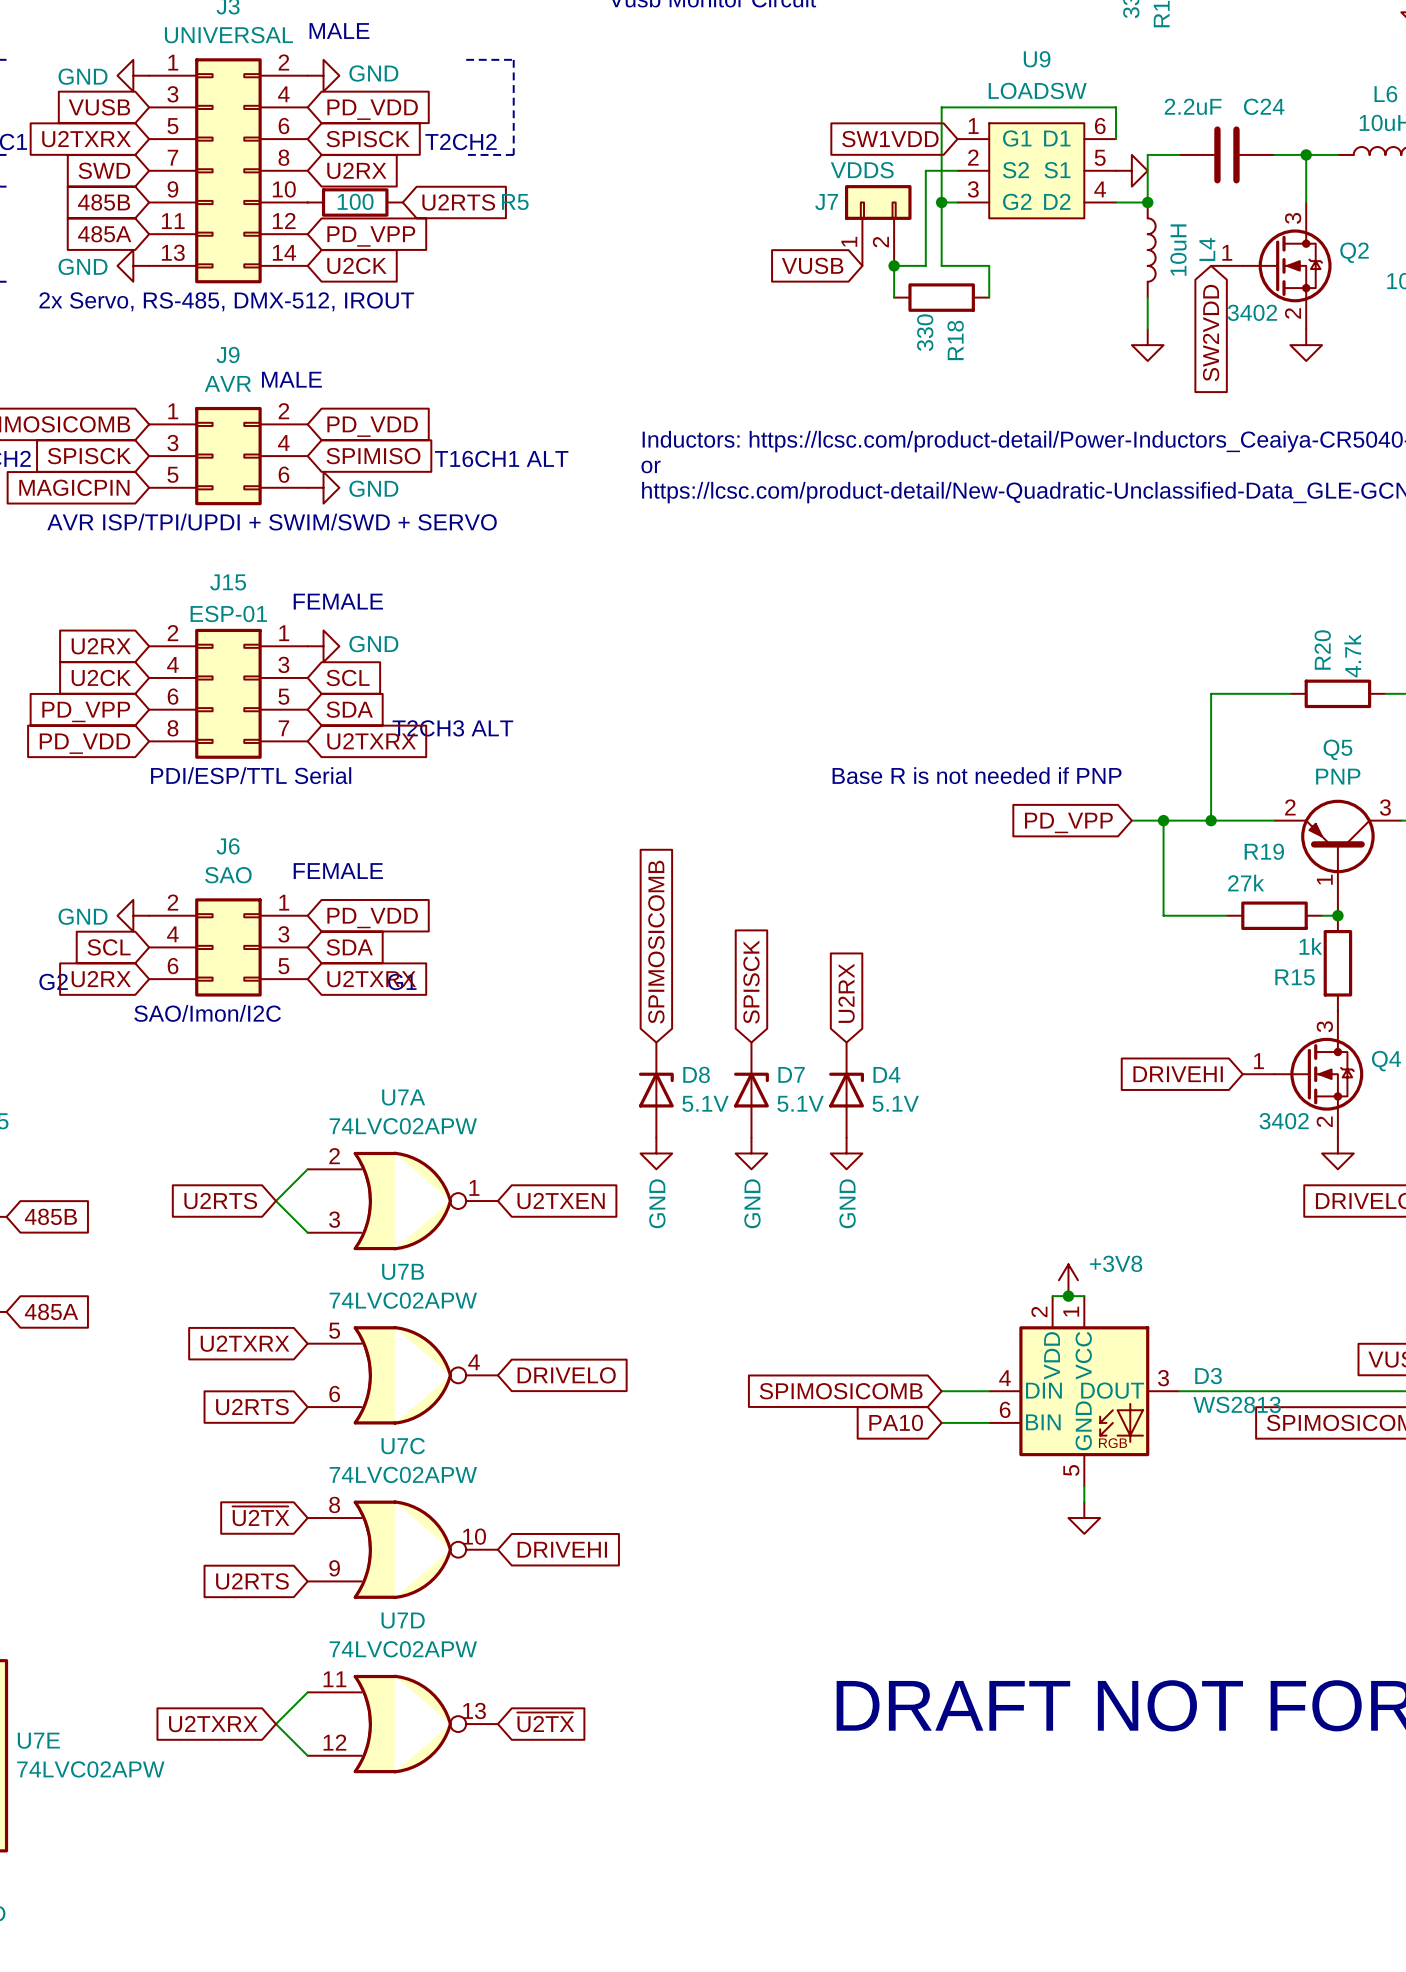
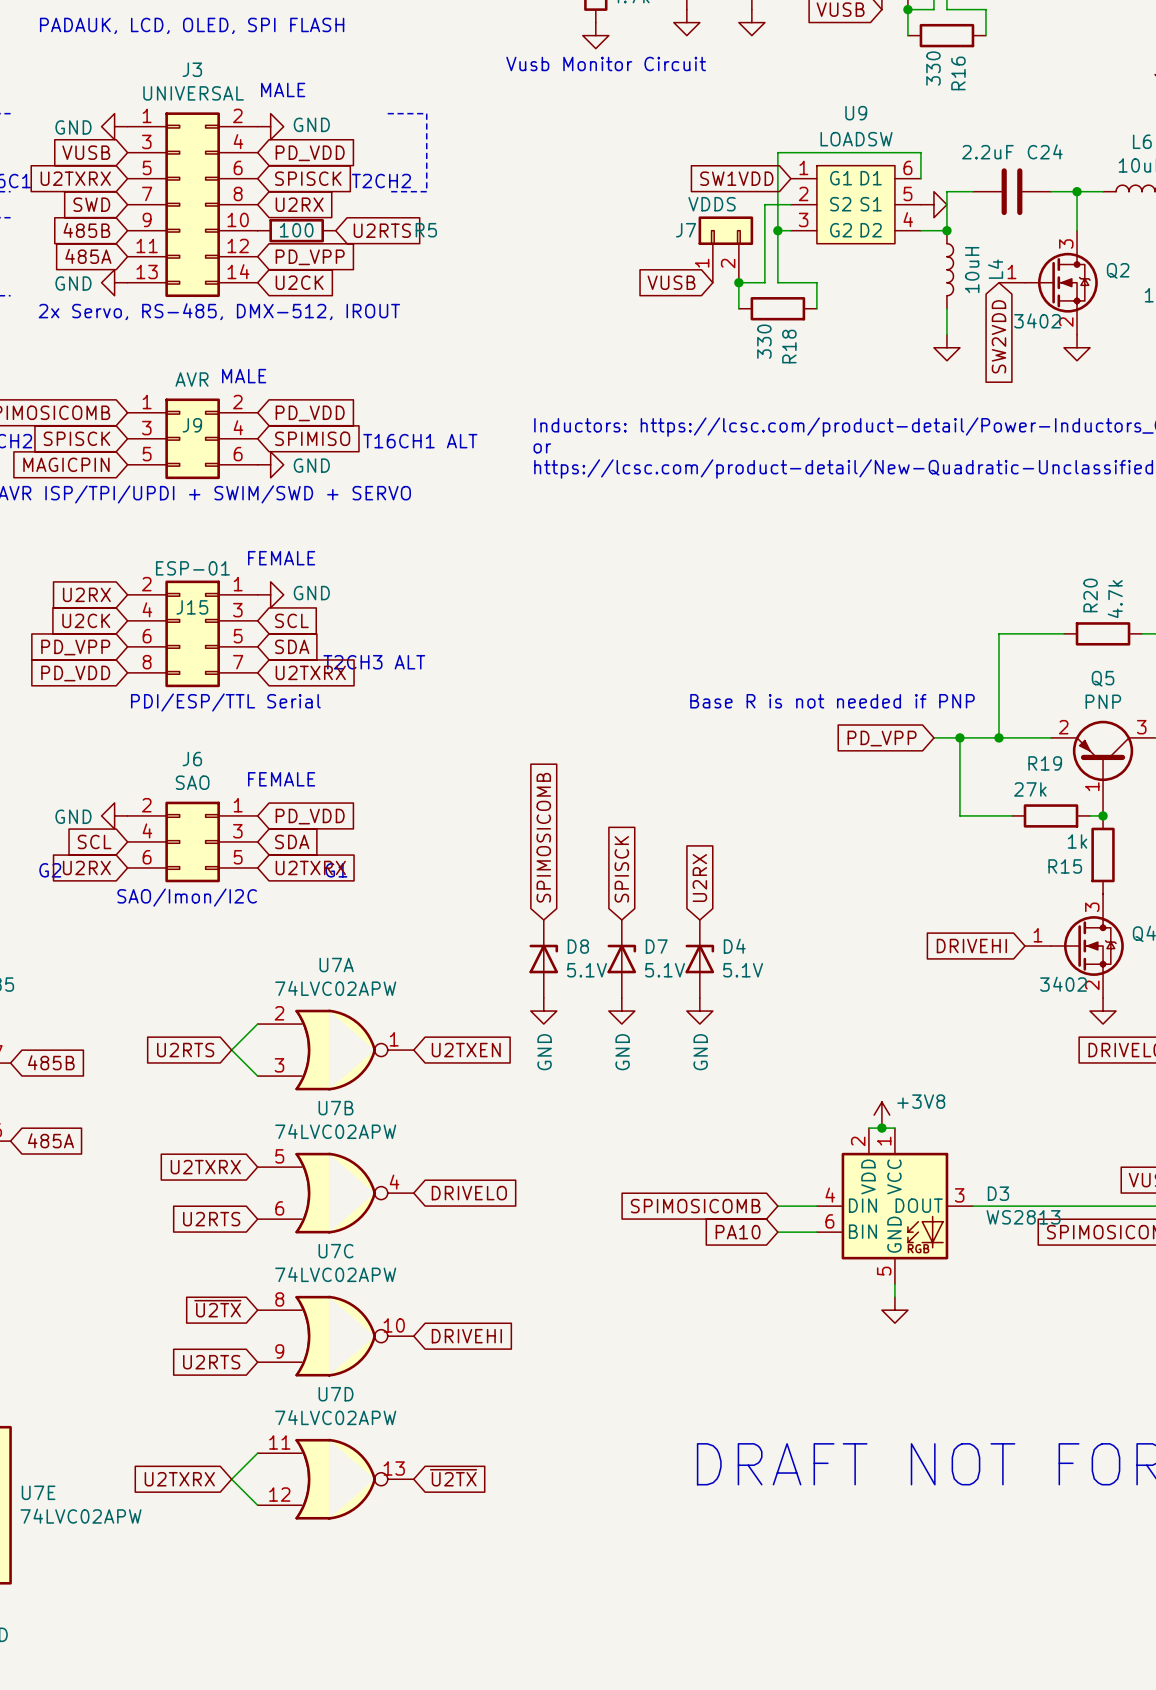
J9 name position: J9 (228, 355) -> J9 (192, 425)
J15 name position: J15 (228, 582) -> J15 (192, 607)

